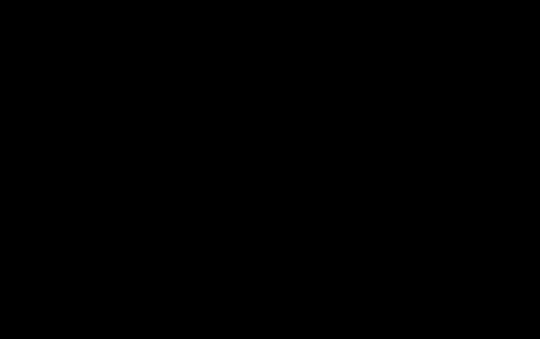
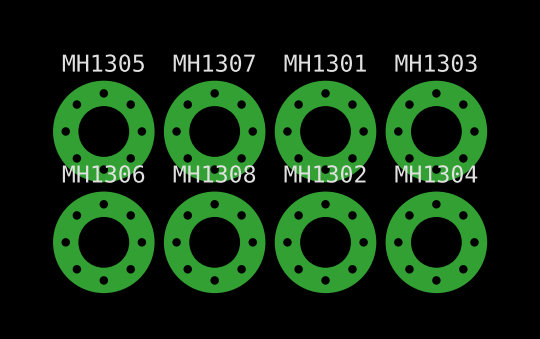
MH1305: none -> (103, 131)
MH1307: none -> (214, 131)
MH1301: none -> (325, 131)
MH1303: none -> (436, 131)
MH1306: none -> (103, 242)
MH1308: none -> (214, 242)
MH1302: none -> (325, 242)
MH1304: none -> (436, 242)

